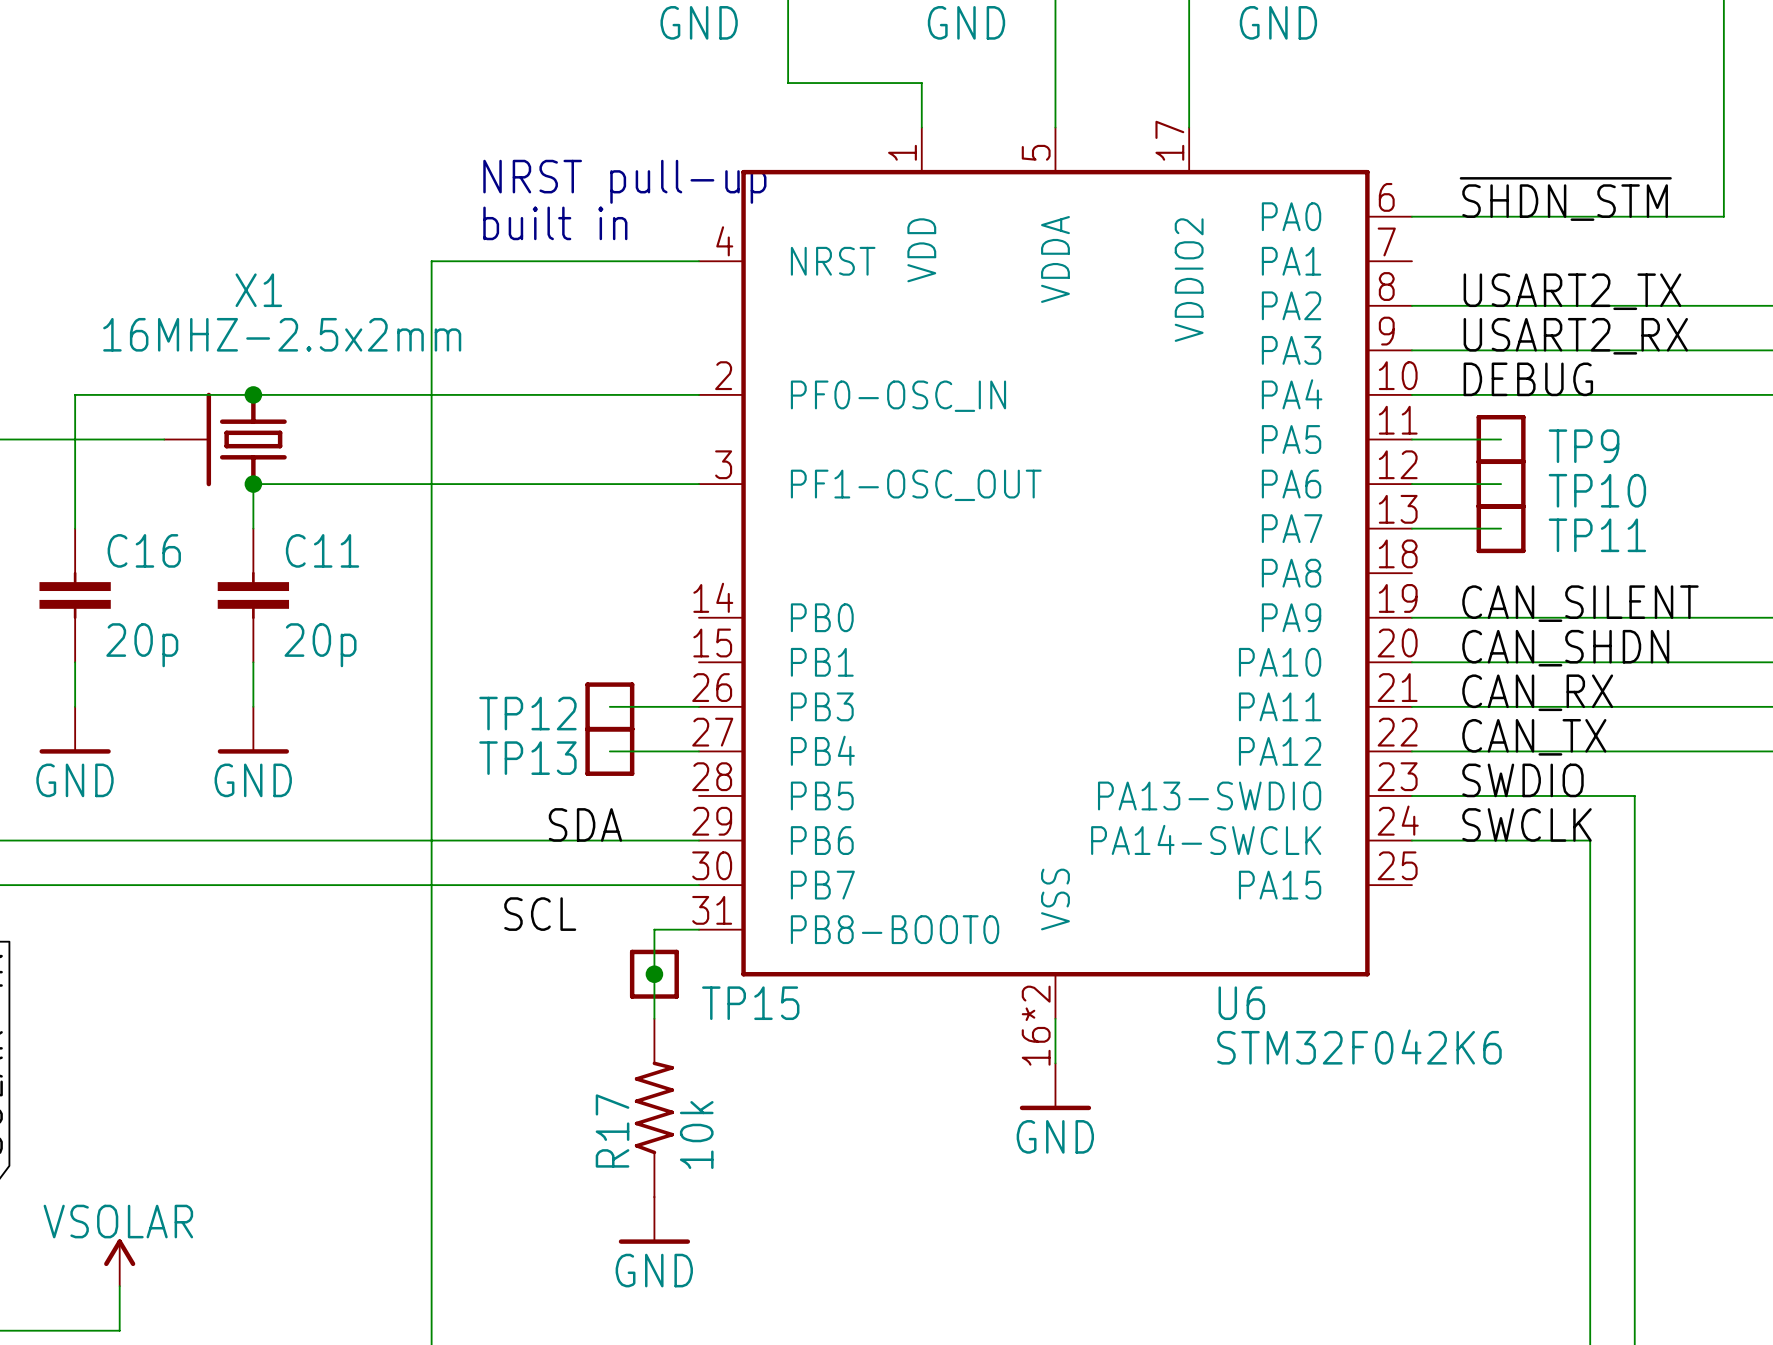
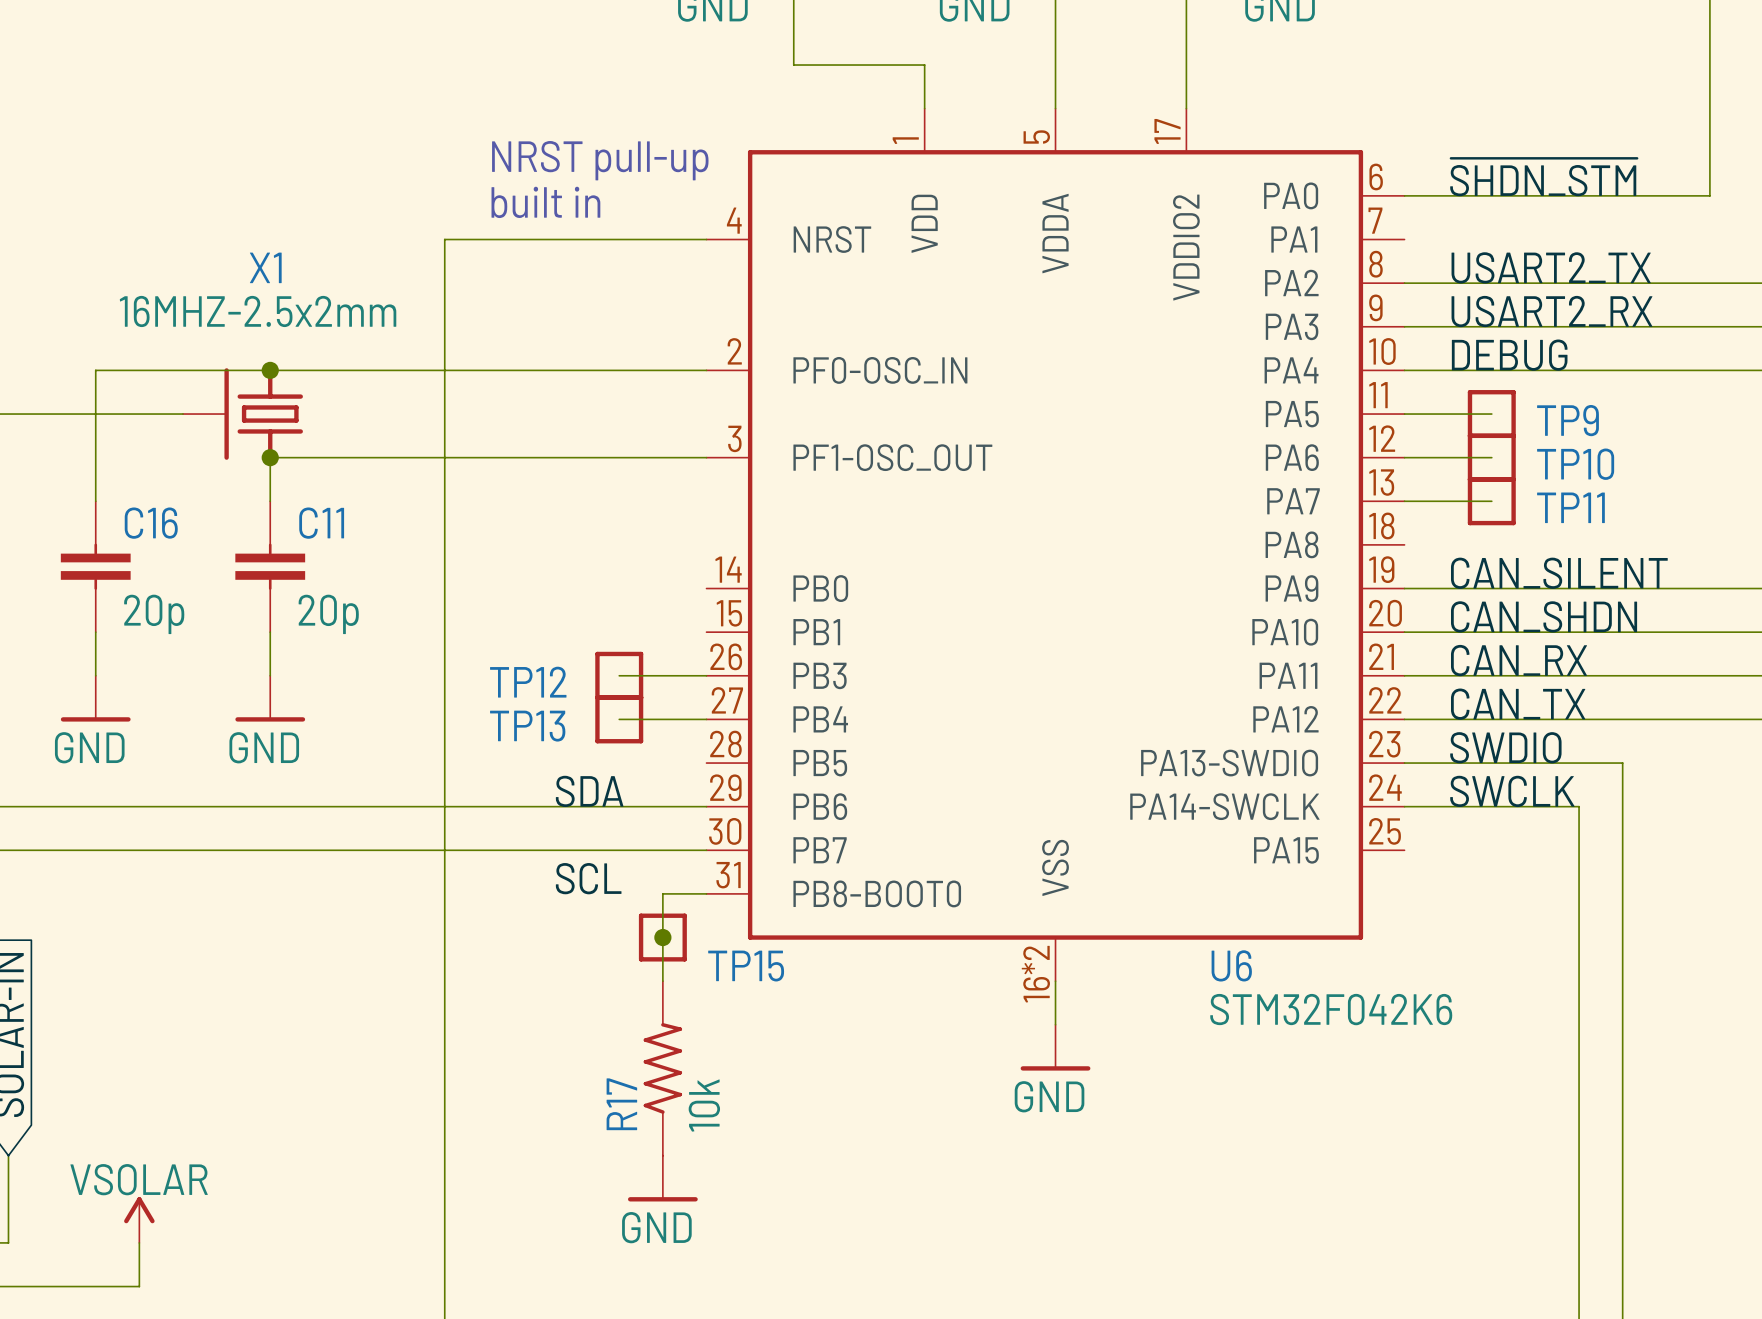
label position: SCL (540, 914) -> SCL (588, 878)

